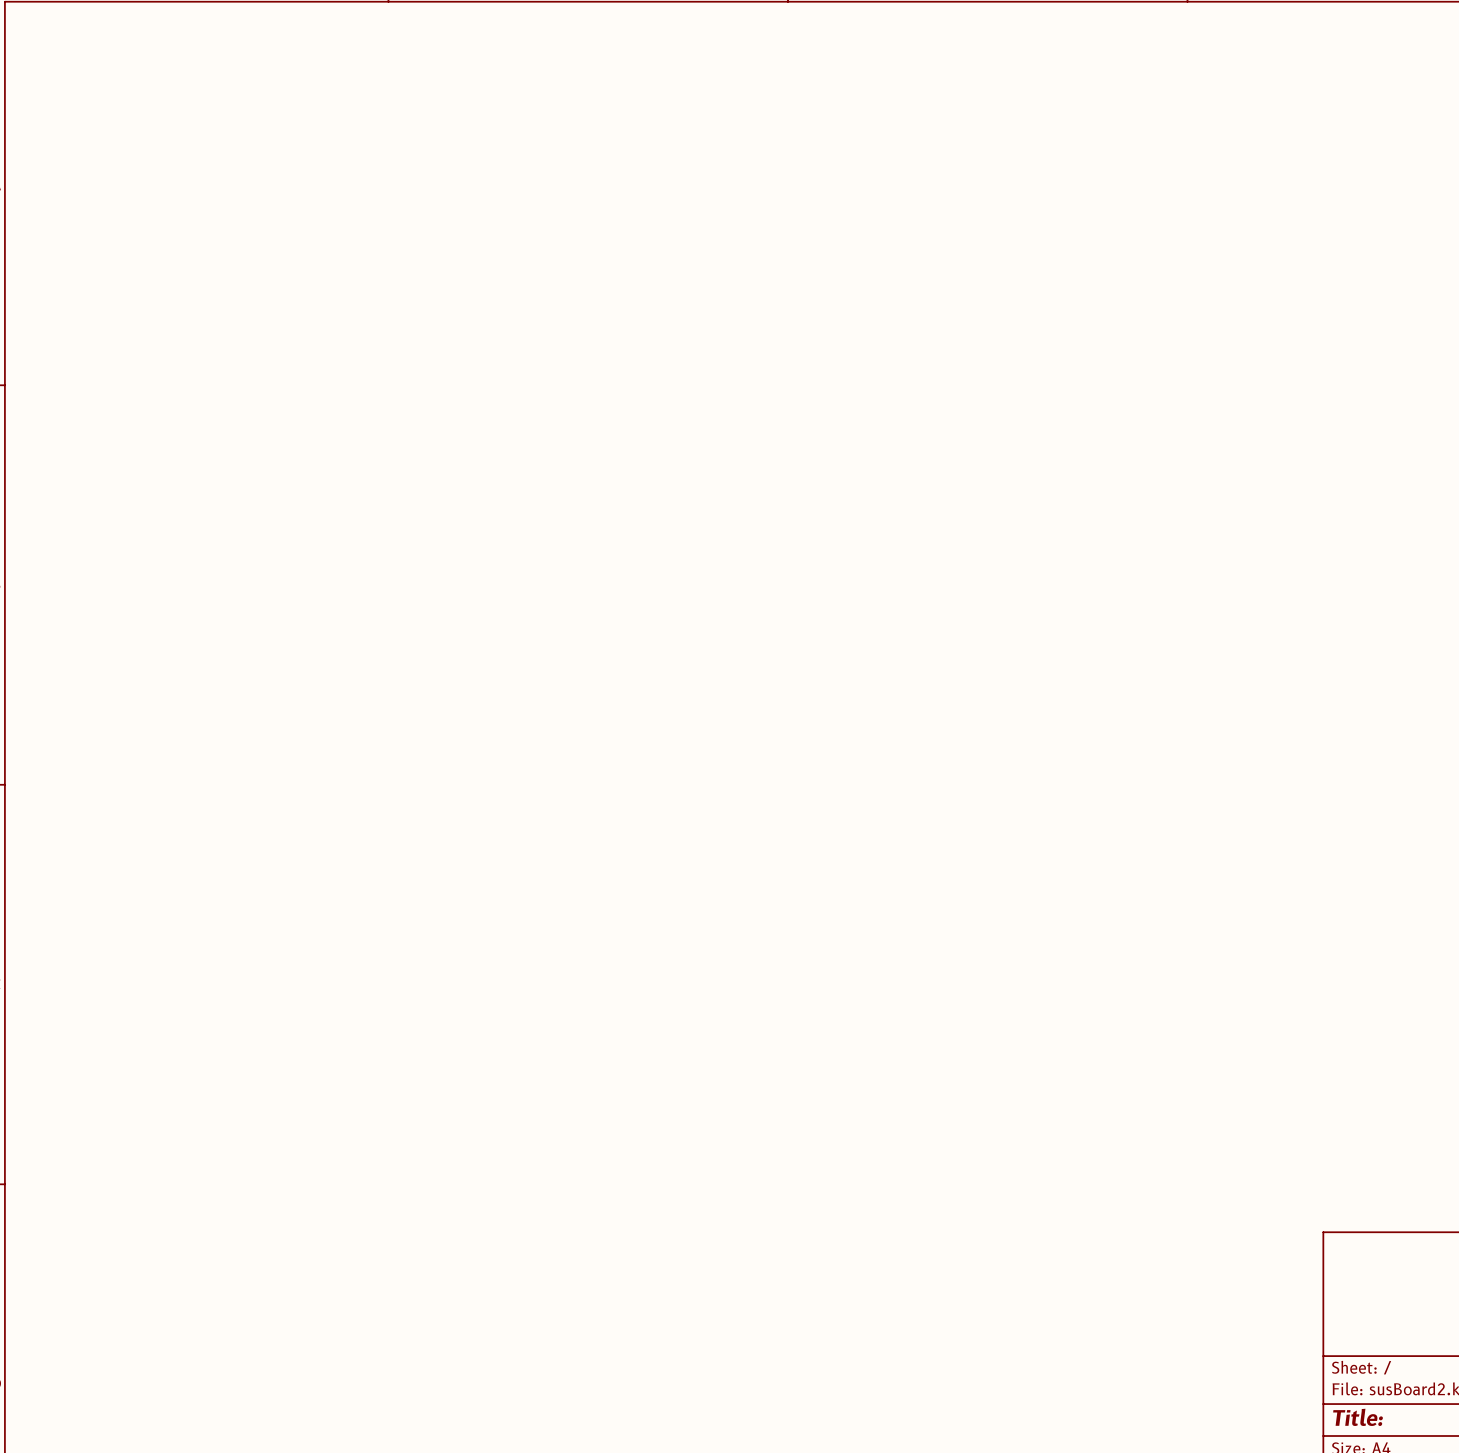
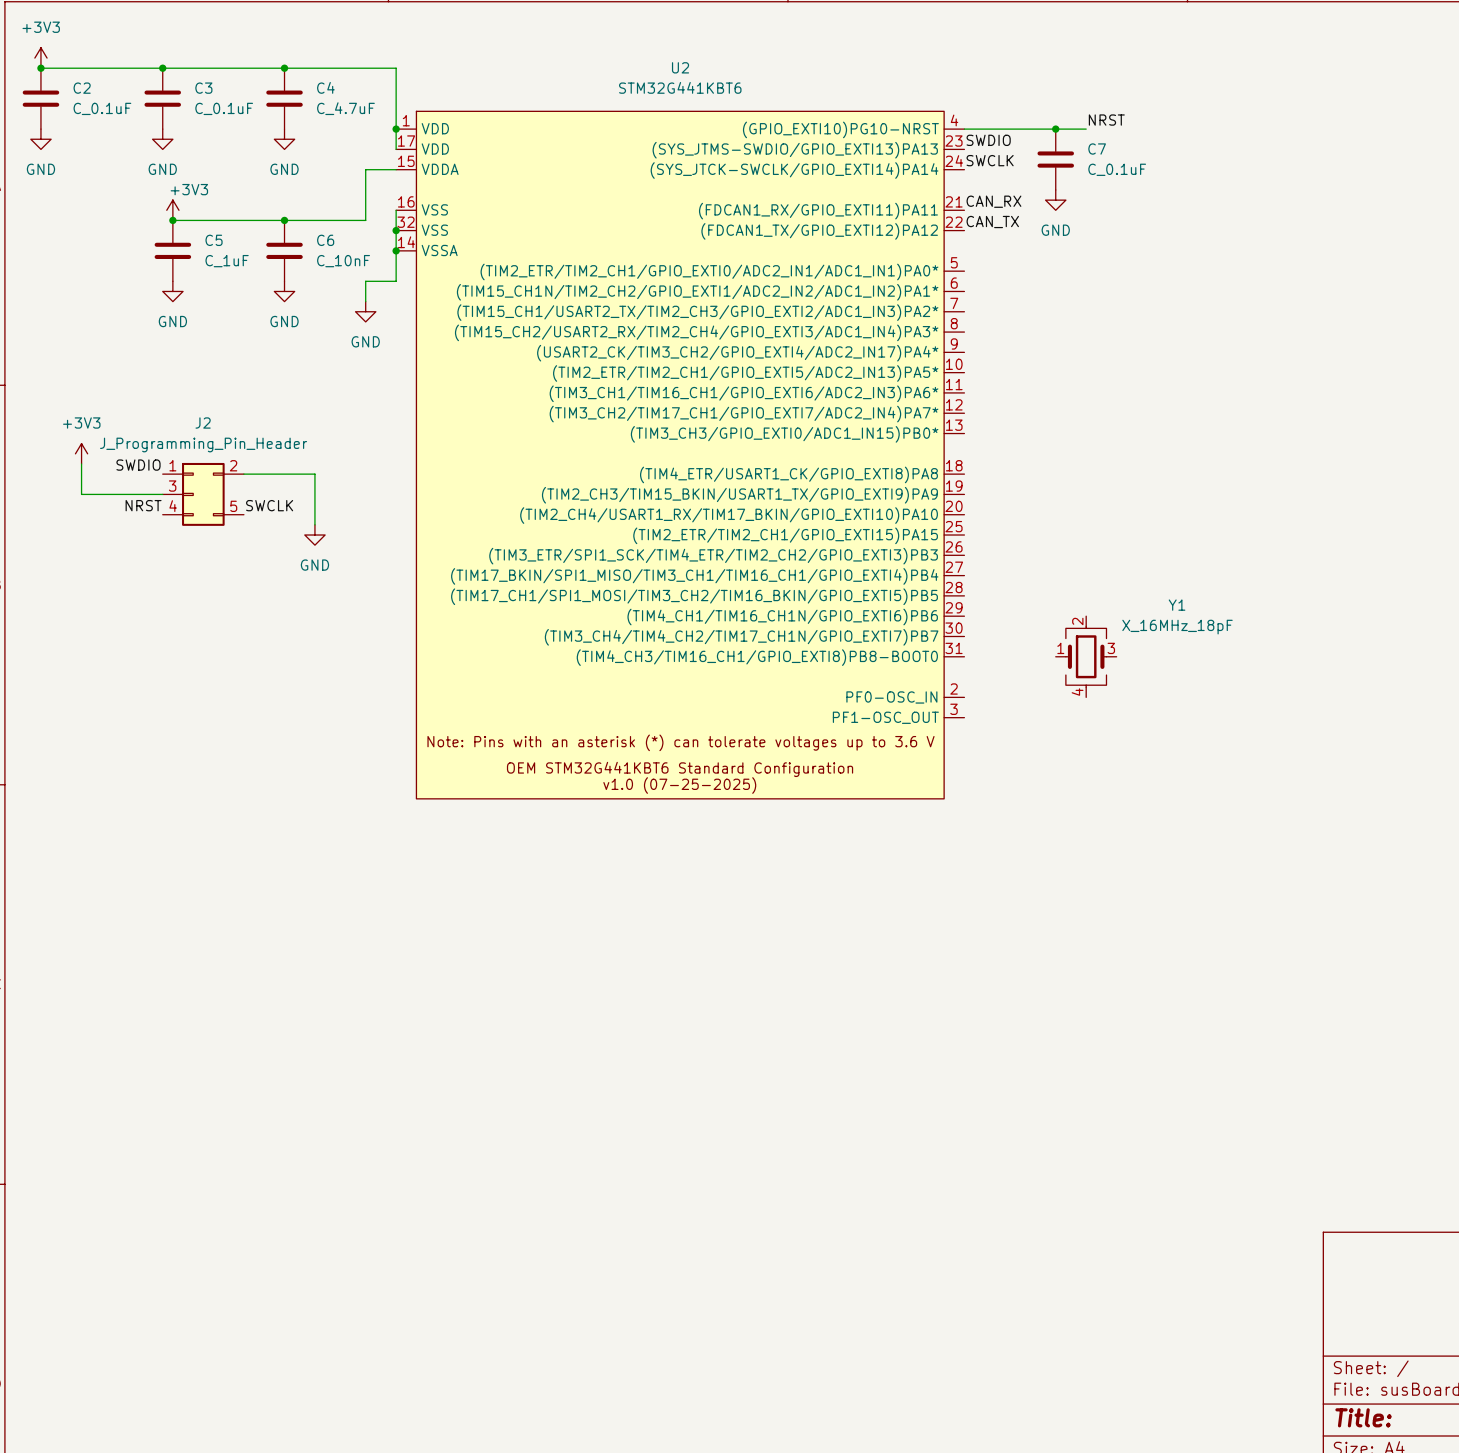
power symbol: none -> +3V3 (40, 58)
wire: none -> (40, 68) (396, 68) (396, 149)
junction: none -> (40, 68)
junction: none -> (162, 68)
junction: none -> (284, 68)
C2: none -> C_0.1uF (40, 98)
C3: none -> C_0.1uF (162, 98)
C4: none -> C_4.7uF (284, 98)
label: none -> NRST (1106, 120)
junction: none -> (396, 129)
wire: none -> (964, 129) (1086, 129)
junction: none -> (1055, 129)
power symbol: none -> GND (40, 139)
power symbol: none -> GND (162, 139)
power symbol: none -> GND (284, 139)
label: none -> SWDIO (988, 140)
C7: none -> C_0.1uF (1055, 159)
label: none -> SWCLK (990, 160)
wire: none -> (396, 169) (365, 169) (365, 220) (172, 220)
power symbol: none -> GND (1055, 200)
label: none -> CAN_RX (993, 201)
power symbol: none -> +3V3 (172, 210)
wire: none -> (396, 210) (396, 281) (365, 281) (365, 301)
junction: none -> (172, 220)
junction: none -> (284, 220)
label: none -> CAN_TX (992, 222)
junction: none -> (396, 230)
C5: none -> C_1uF (172, 250)
C6: none -> C_10nF (284, 250)
junction: none -> (396, 250)
power symbol: none -> GND (172, 291)
power symbol: none -> GND (284, 291)
power symbol: none -> GND (365, 311)
power symbol: none -> +3V3 (81, 453)
U2: none -> STM32G441KBT6 (680, 455)
wire: none -> (81, 463) (81, 494) (162, 494)
label: none -> SWDIO (138, 465)
wire: none -> (243, 474) (314, 474) (314, 524)
J2: none -> J_Programming_Pin_Header (203, 494)
label: none -> NRST (143, 505)
label: none -> SWCLK (269, 505)
power symbol: none -> GND (314, 535)
Y1: none -> X_16MHz_18pF (1086, 656)

